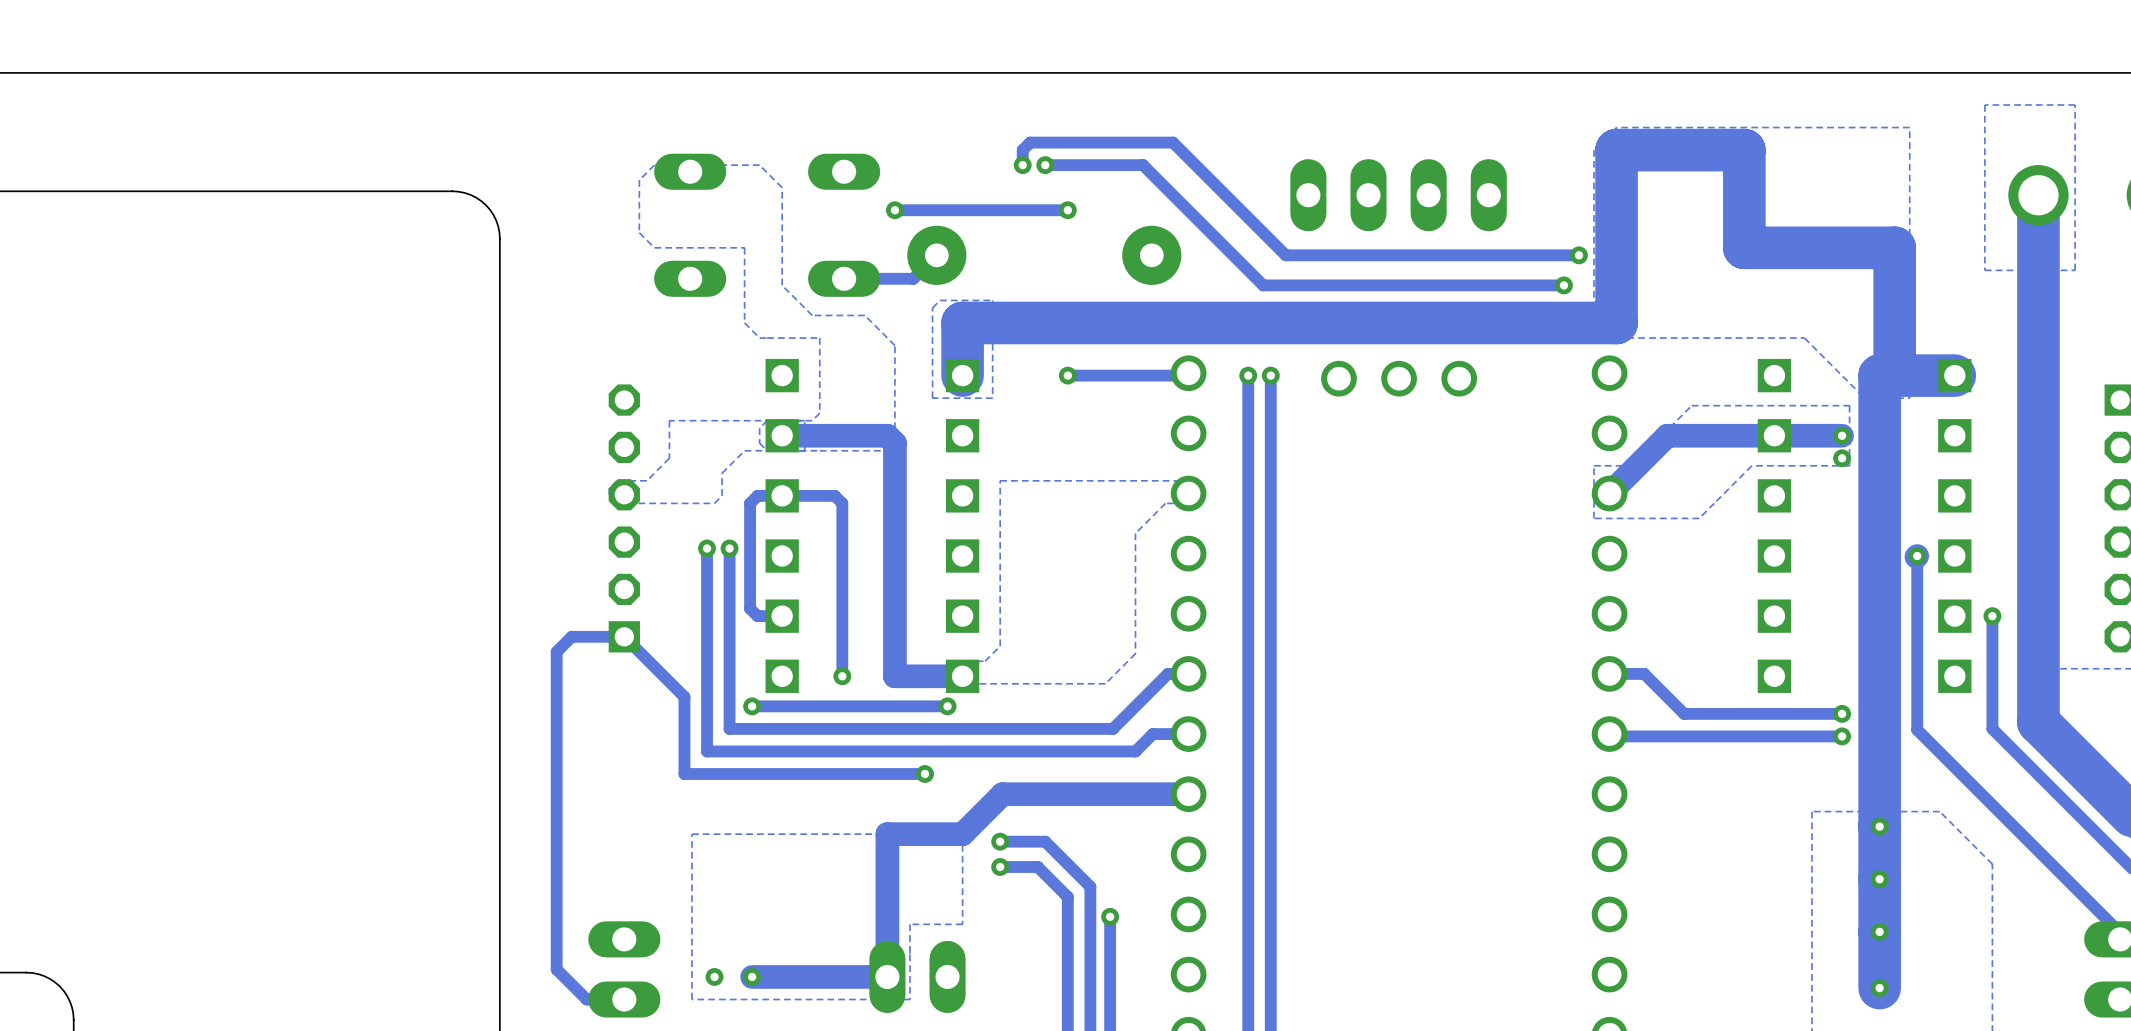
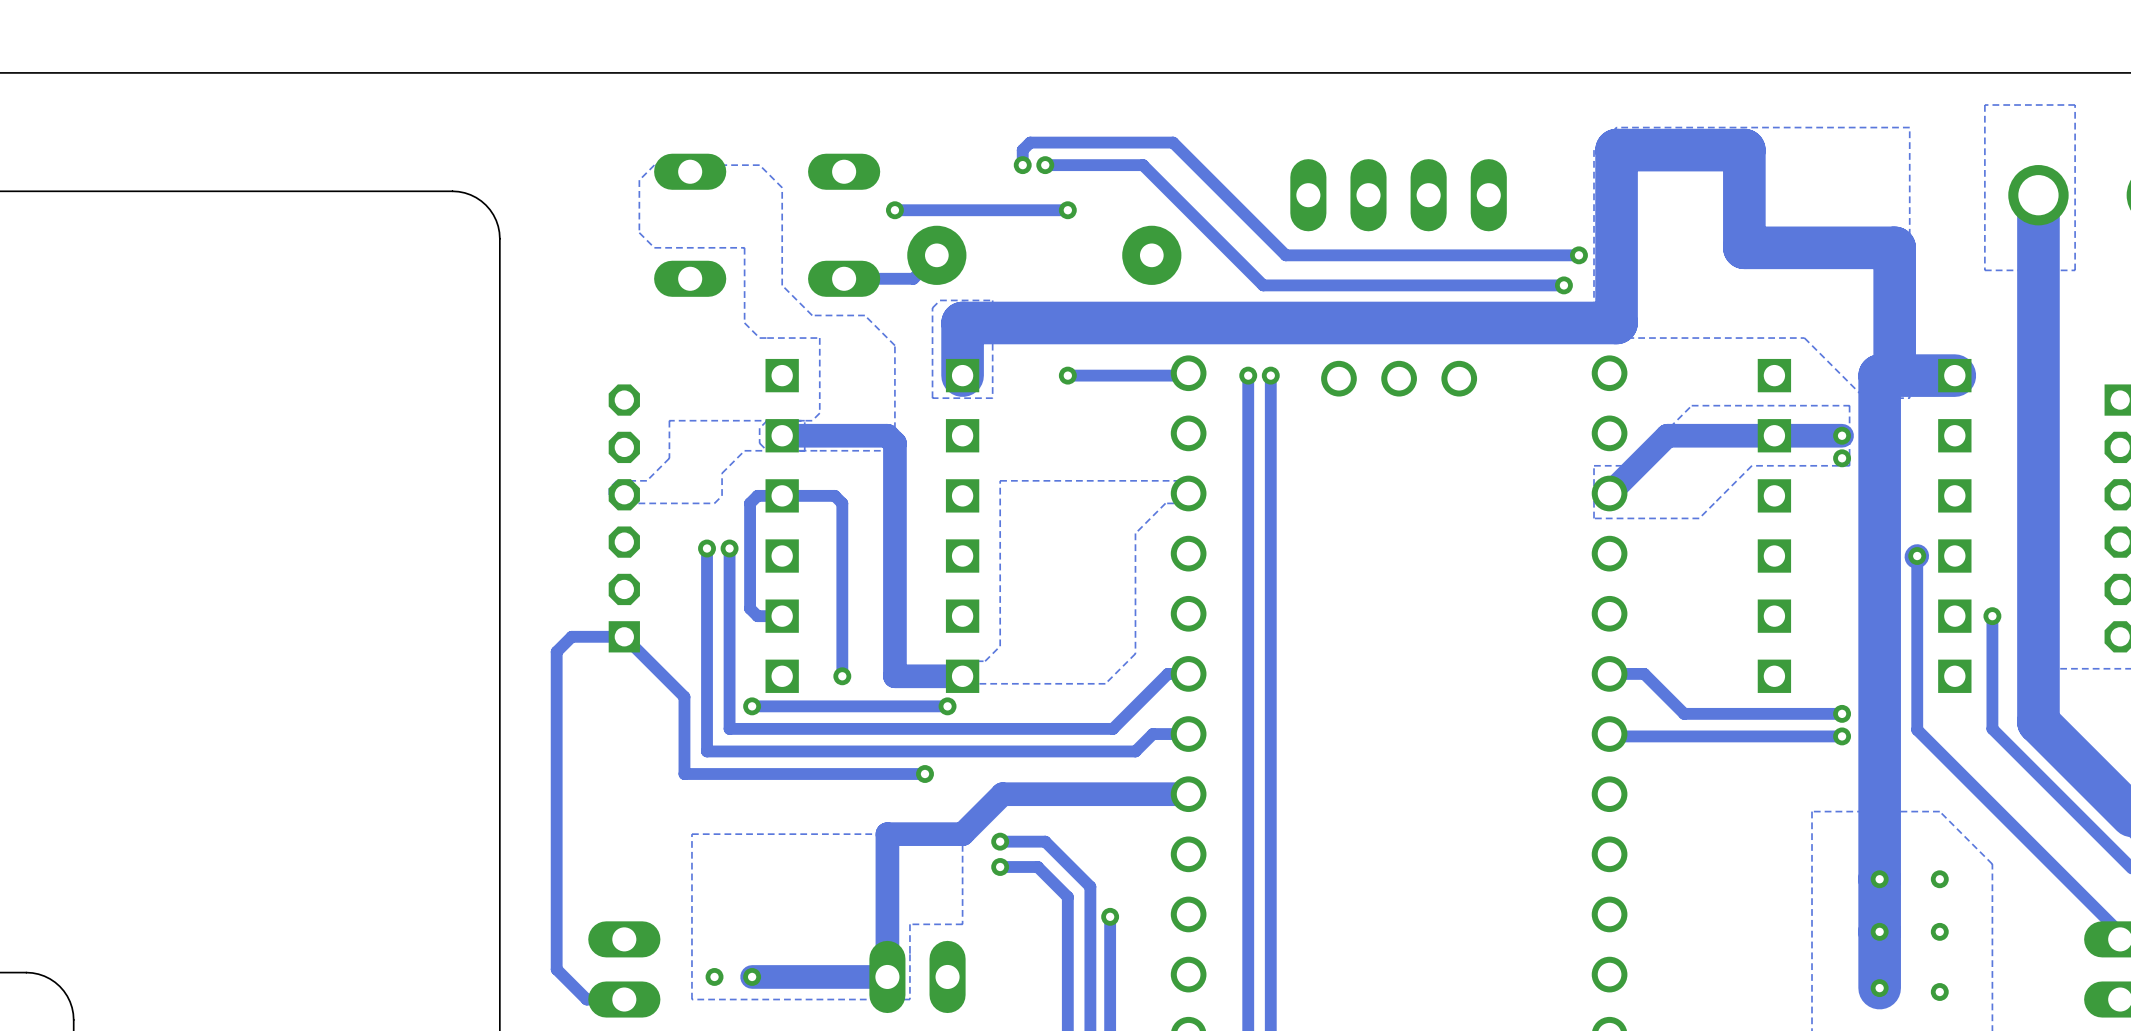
via: (1879, 826) -> none
via: none -> (1939, 879)
via: none -> (1939, 931)
via: none -> (1939, 992)

